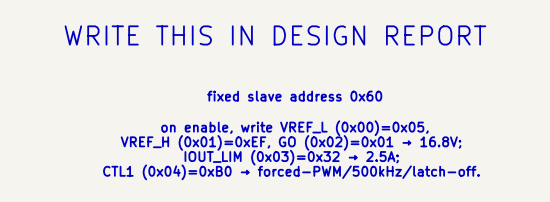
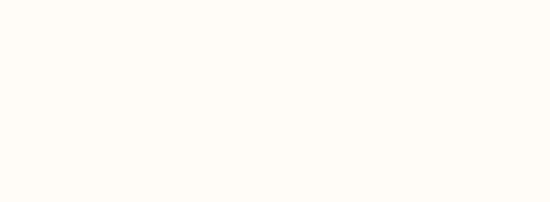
text: WRITE THIS IN DESIGN REPORT (275, 35) -> none
text: fixed slave address 0x60 (294, 96) -> none
text: on enable, write VREF_L (0x00)=0x05, (294, 128) -> none
text: VREF_H (0x01)=0xEF, GO (0x02)=0x01 → 16.8V; (291, 142) -> none
text: IOUT_LIM (0x03)=0x32 → 2.5A; (291, 157) -> none
text: CTL1 (0x04)=0xB0 → forced-PWM/500kHz/latch-off. (291, 172) -> none

